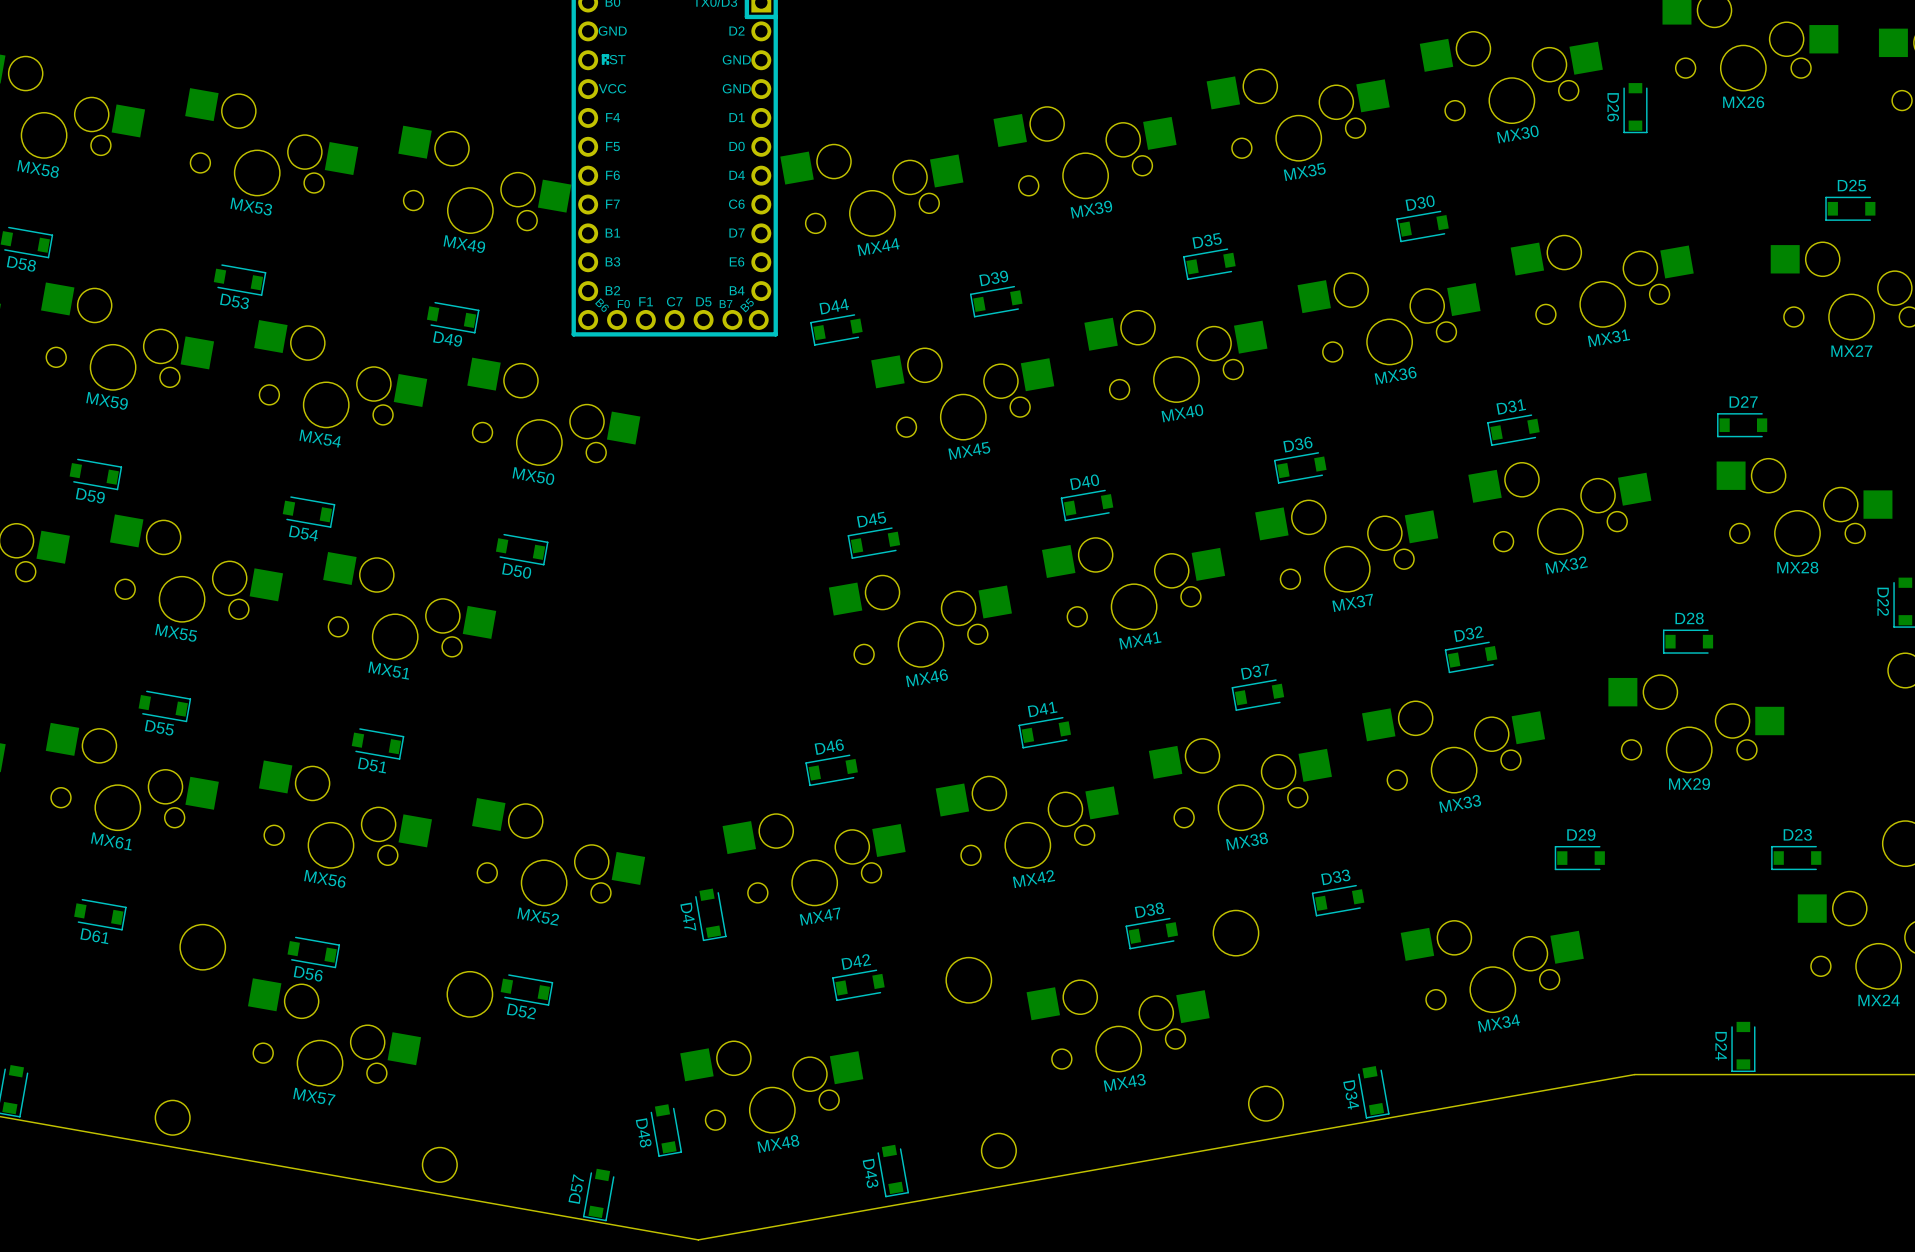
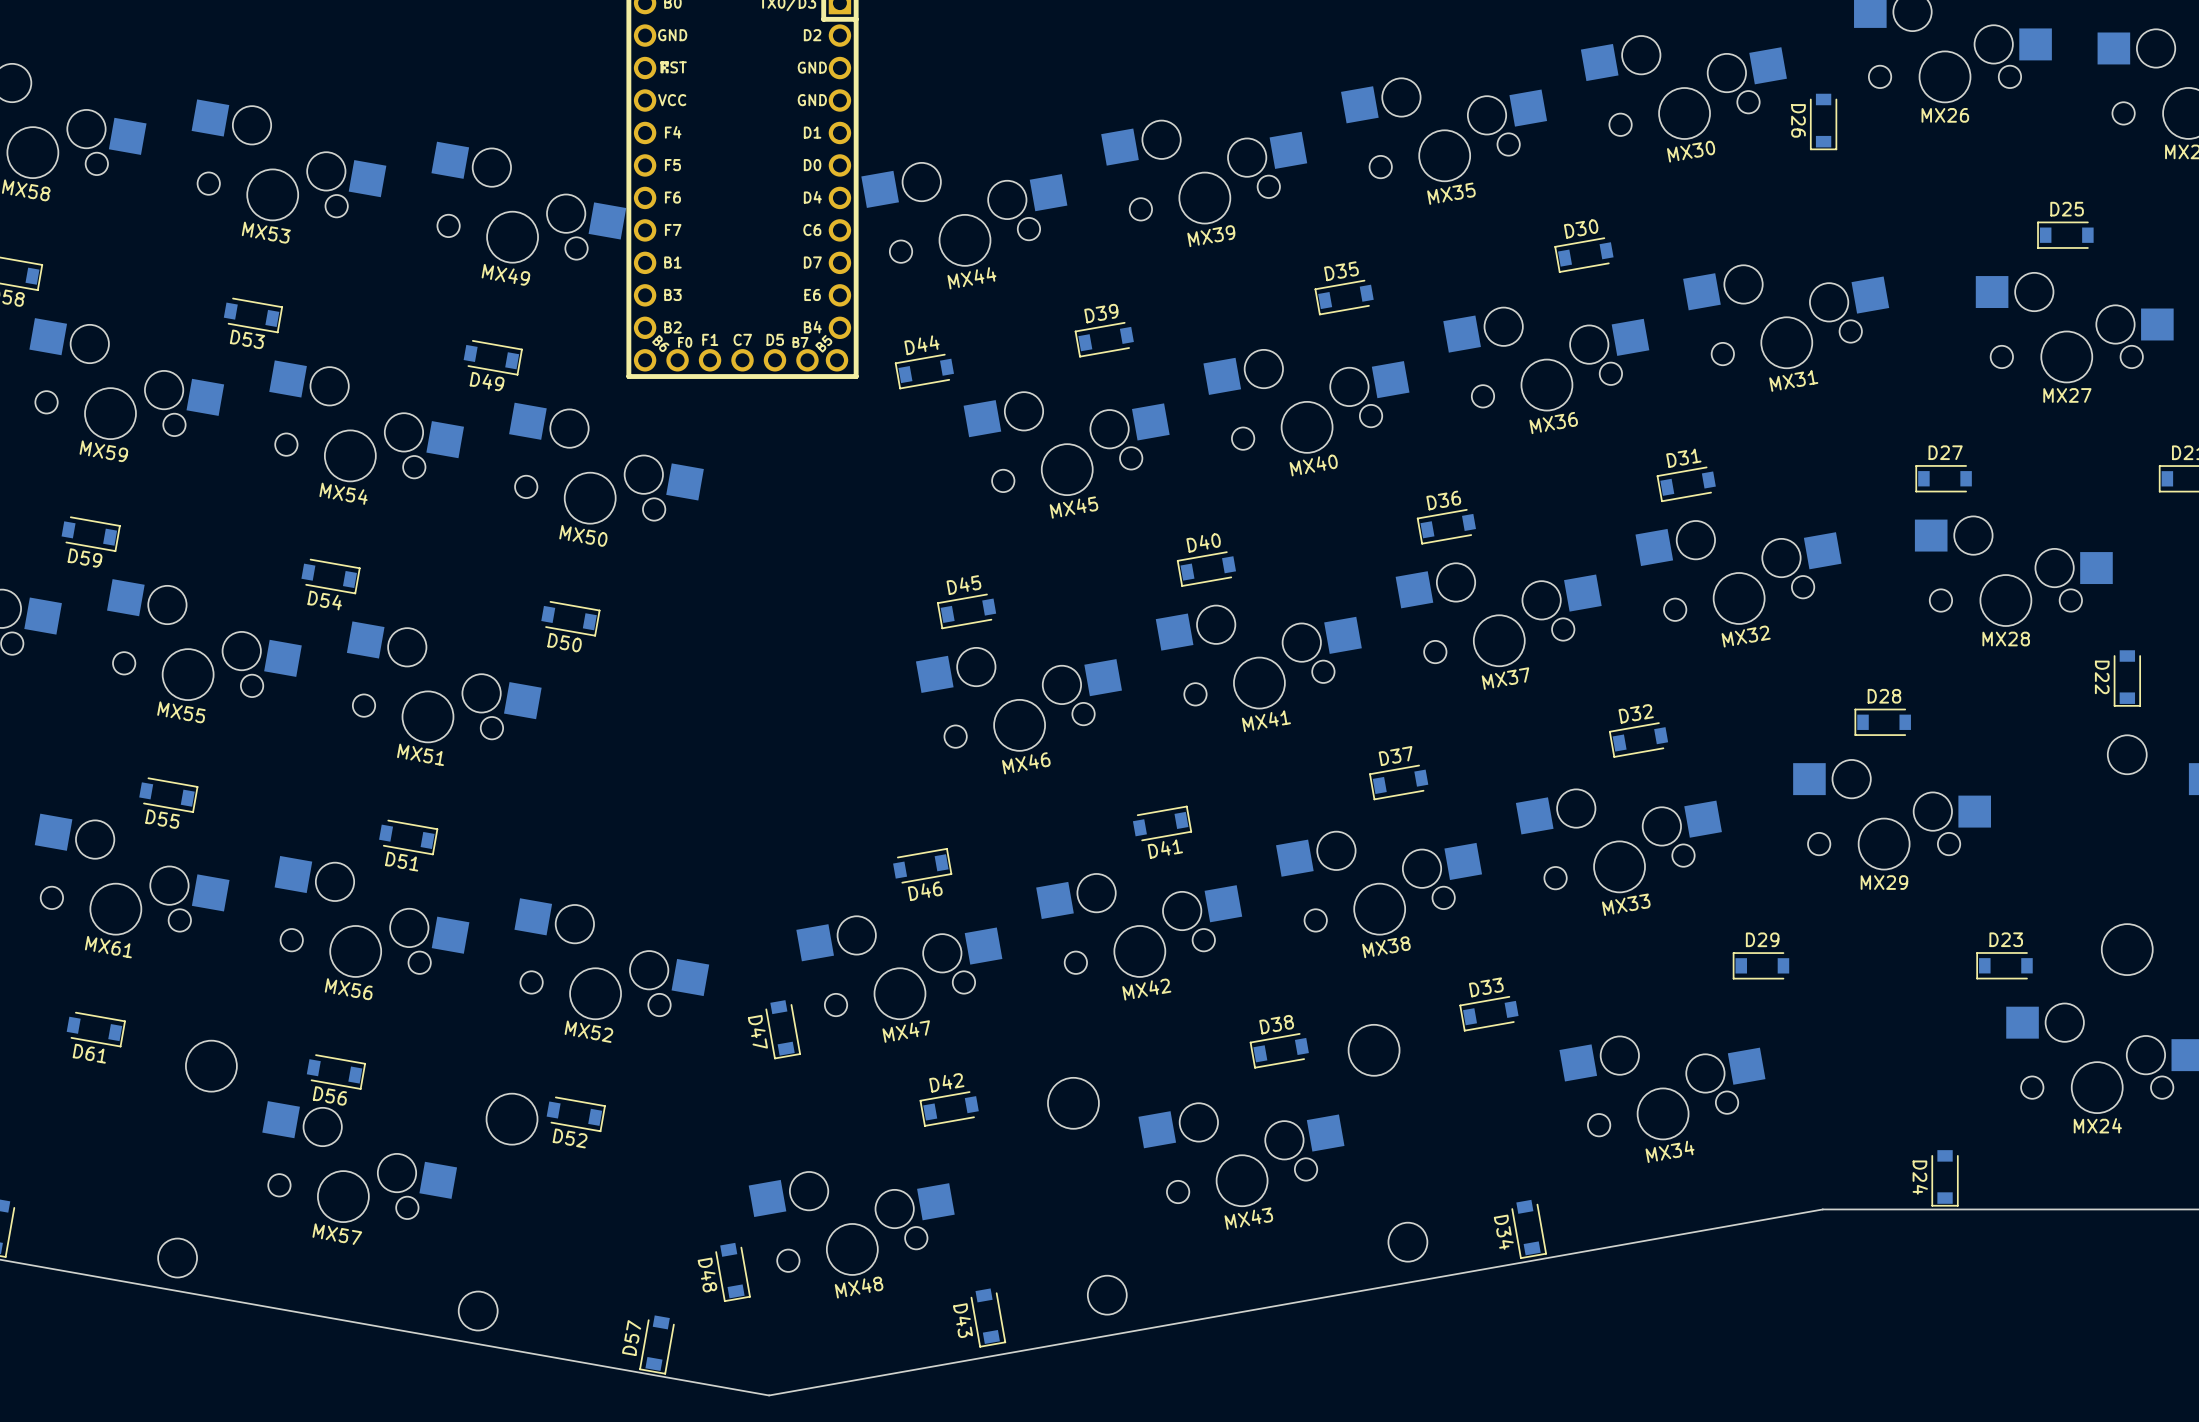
D41 rotation: 0° (1044, 732) -> 180° (1162, 823)
D46 rotation: 0° (831, 770) -> 180° (922, 865)

